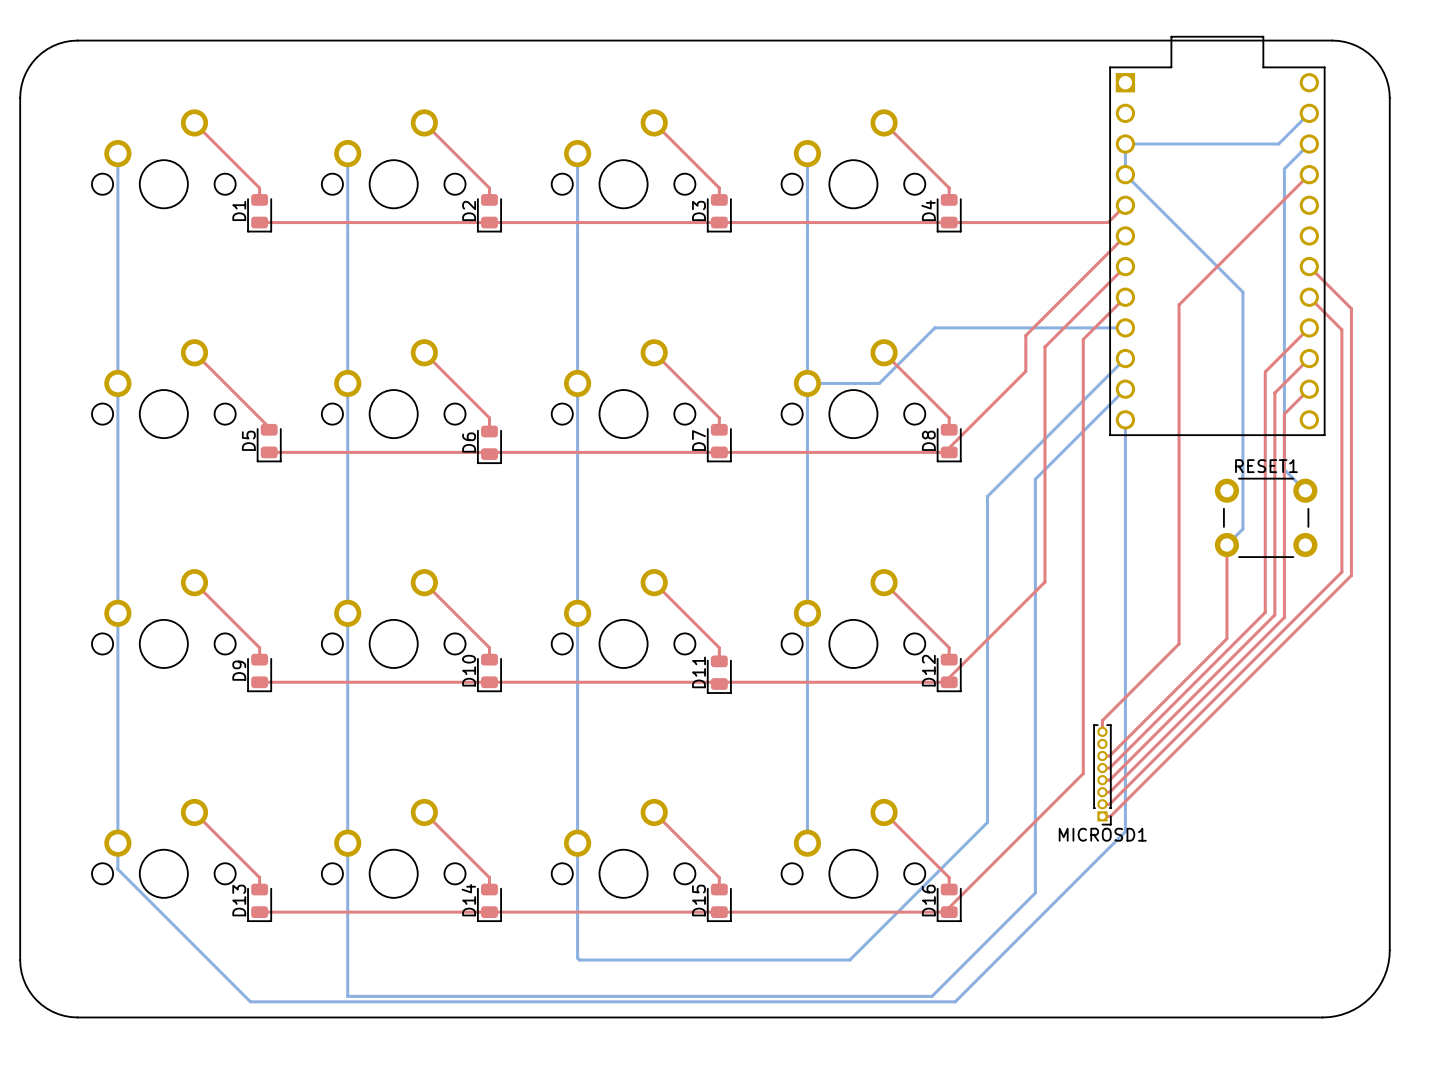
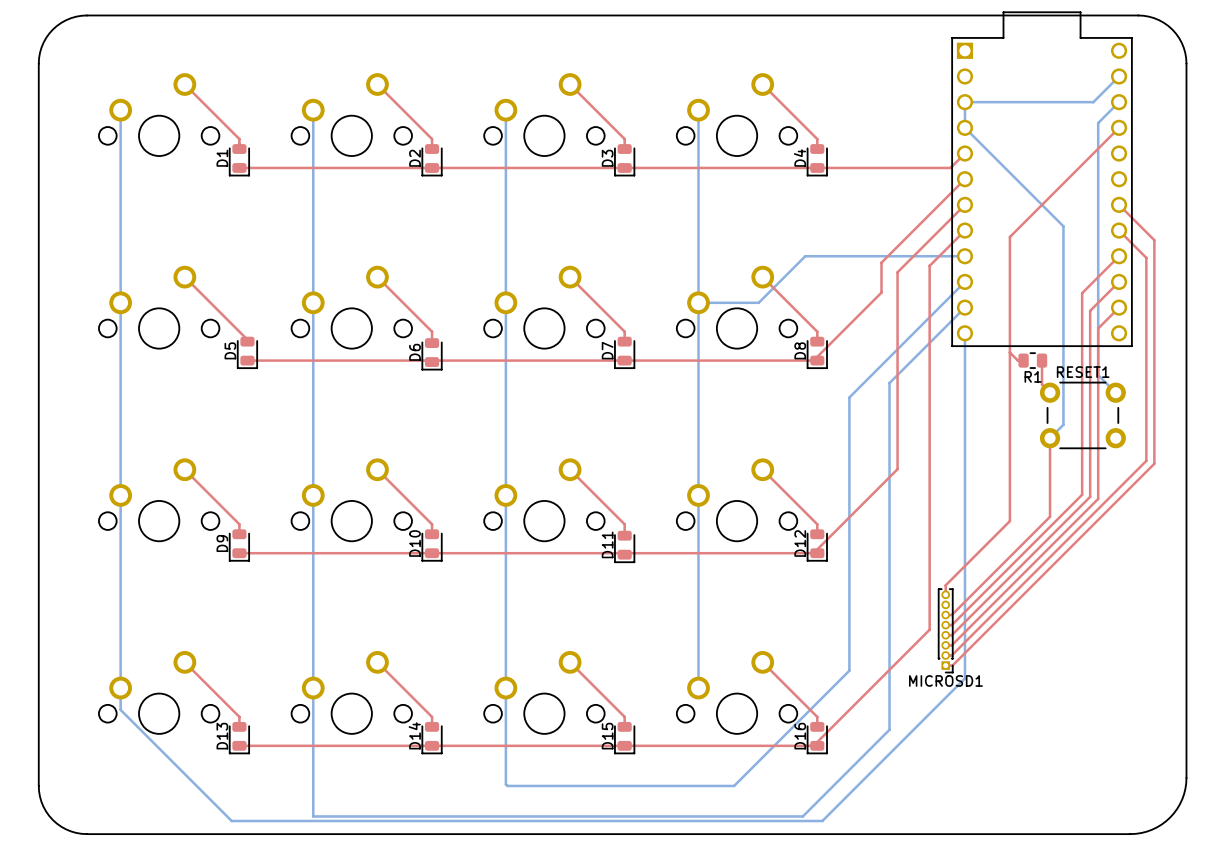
top track: none -> (1009, 352) (1017, 360) (1023, 360)
R1: none -> (1032, 360)
top track: none -> (1042, 360) (1042, 384) (1050, 392)

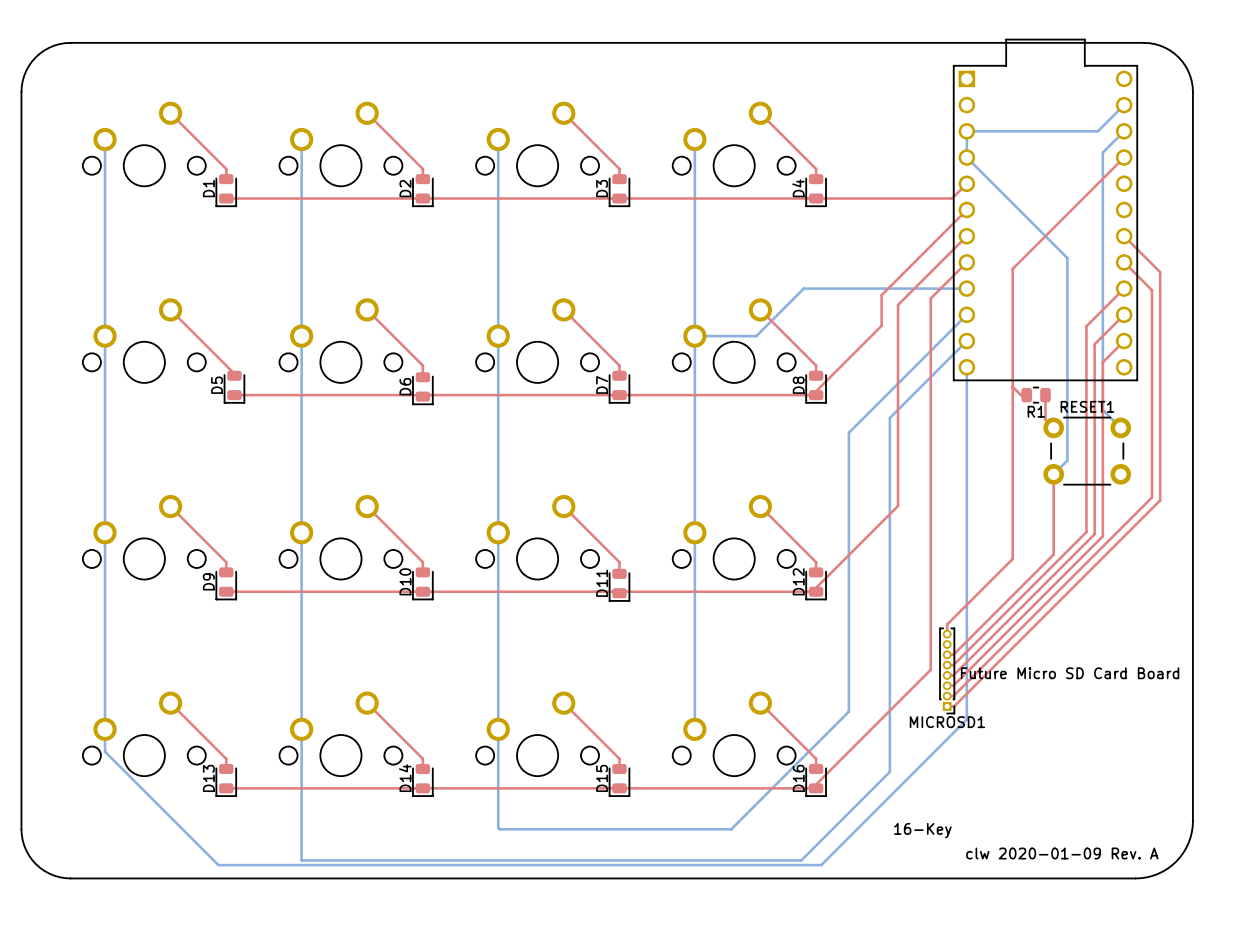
text: none -> Future Micro SD Card Board (1070, 673)
text: none -> 16-Key (922, 830)
text: none -> clw 2020-01-09 Rev. A (1062, 853)

